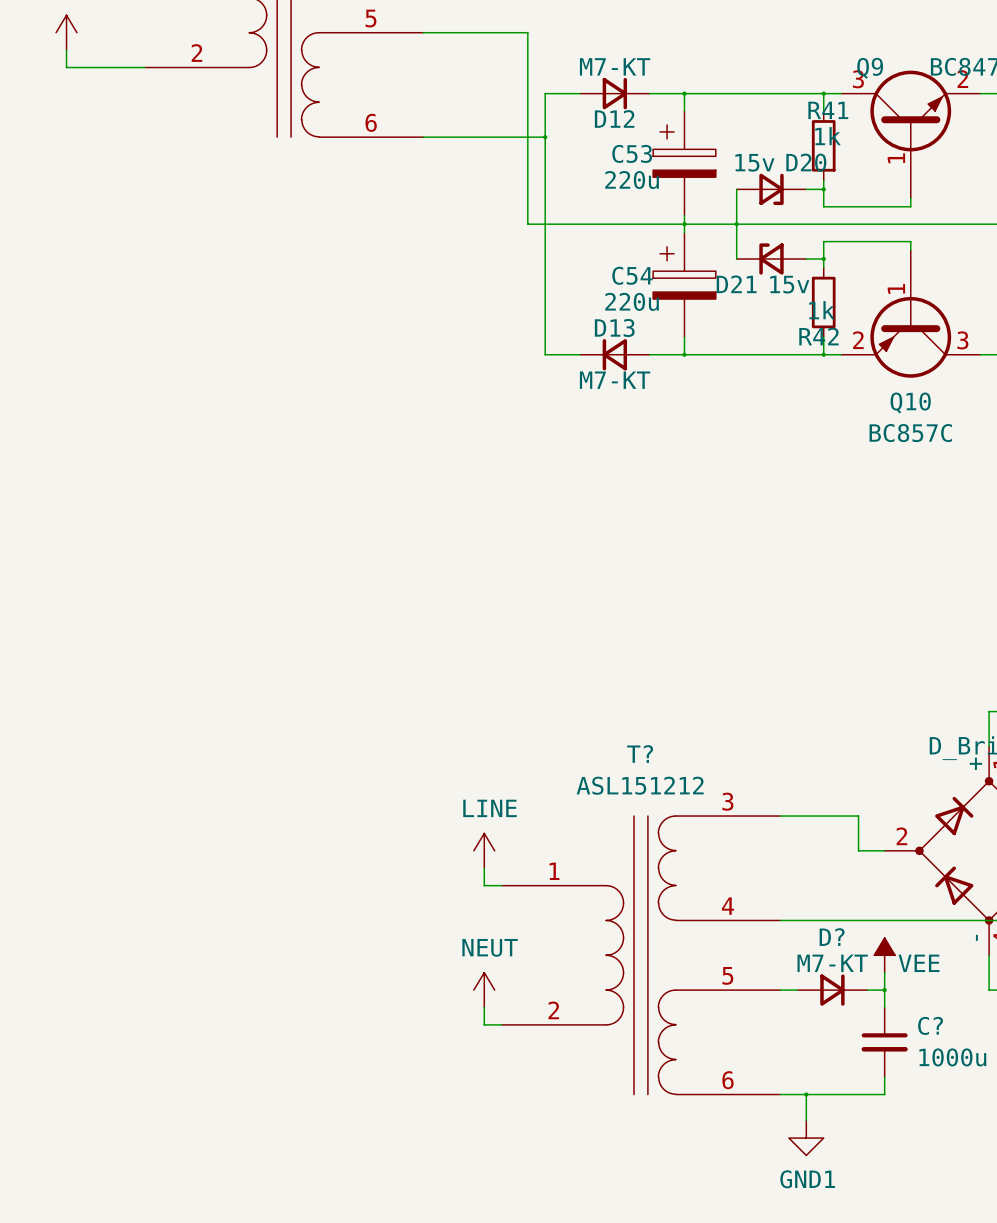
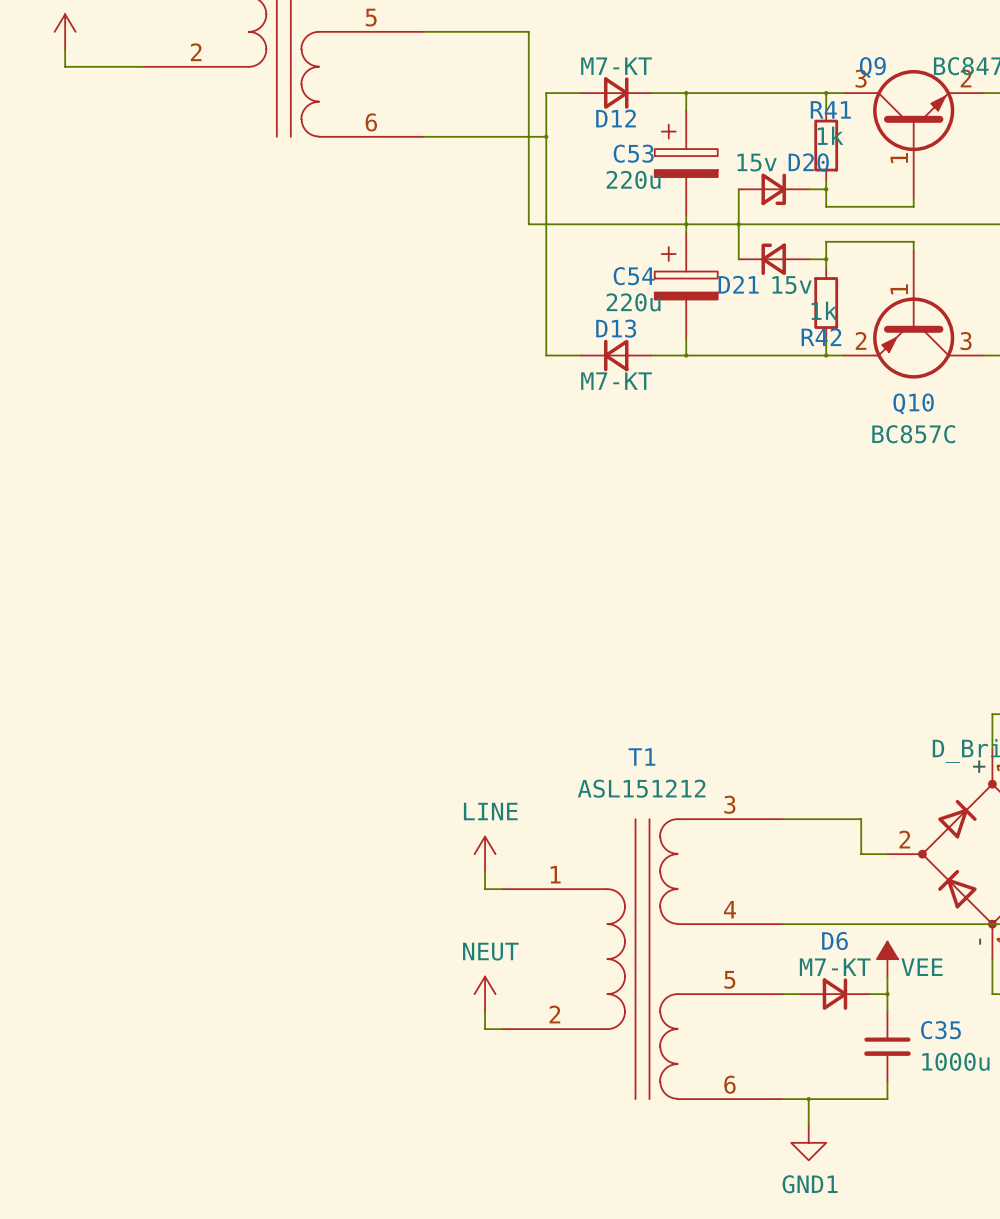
T? name: T? (640, 754) -> T1 (641, 757)
D? name: D? (832, 937) -> D6 (834, 940)
C? name: C? (930, 1025) -> C35 (940, 1030)

